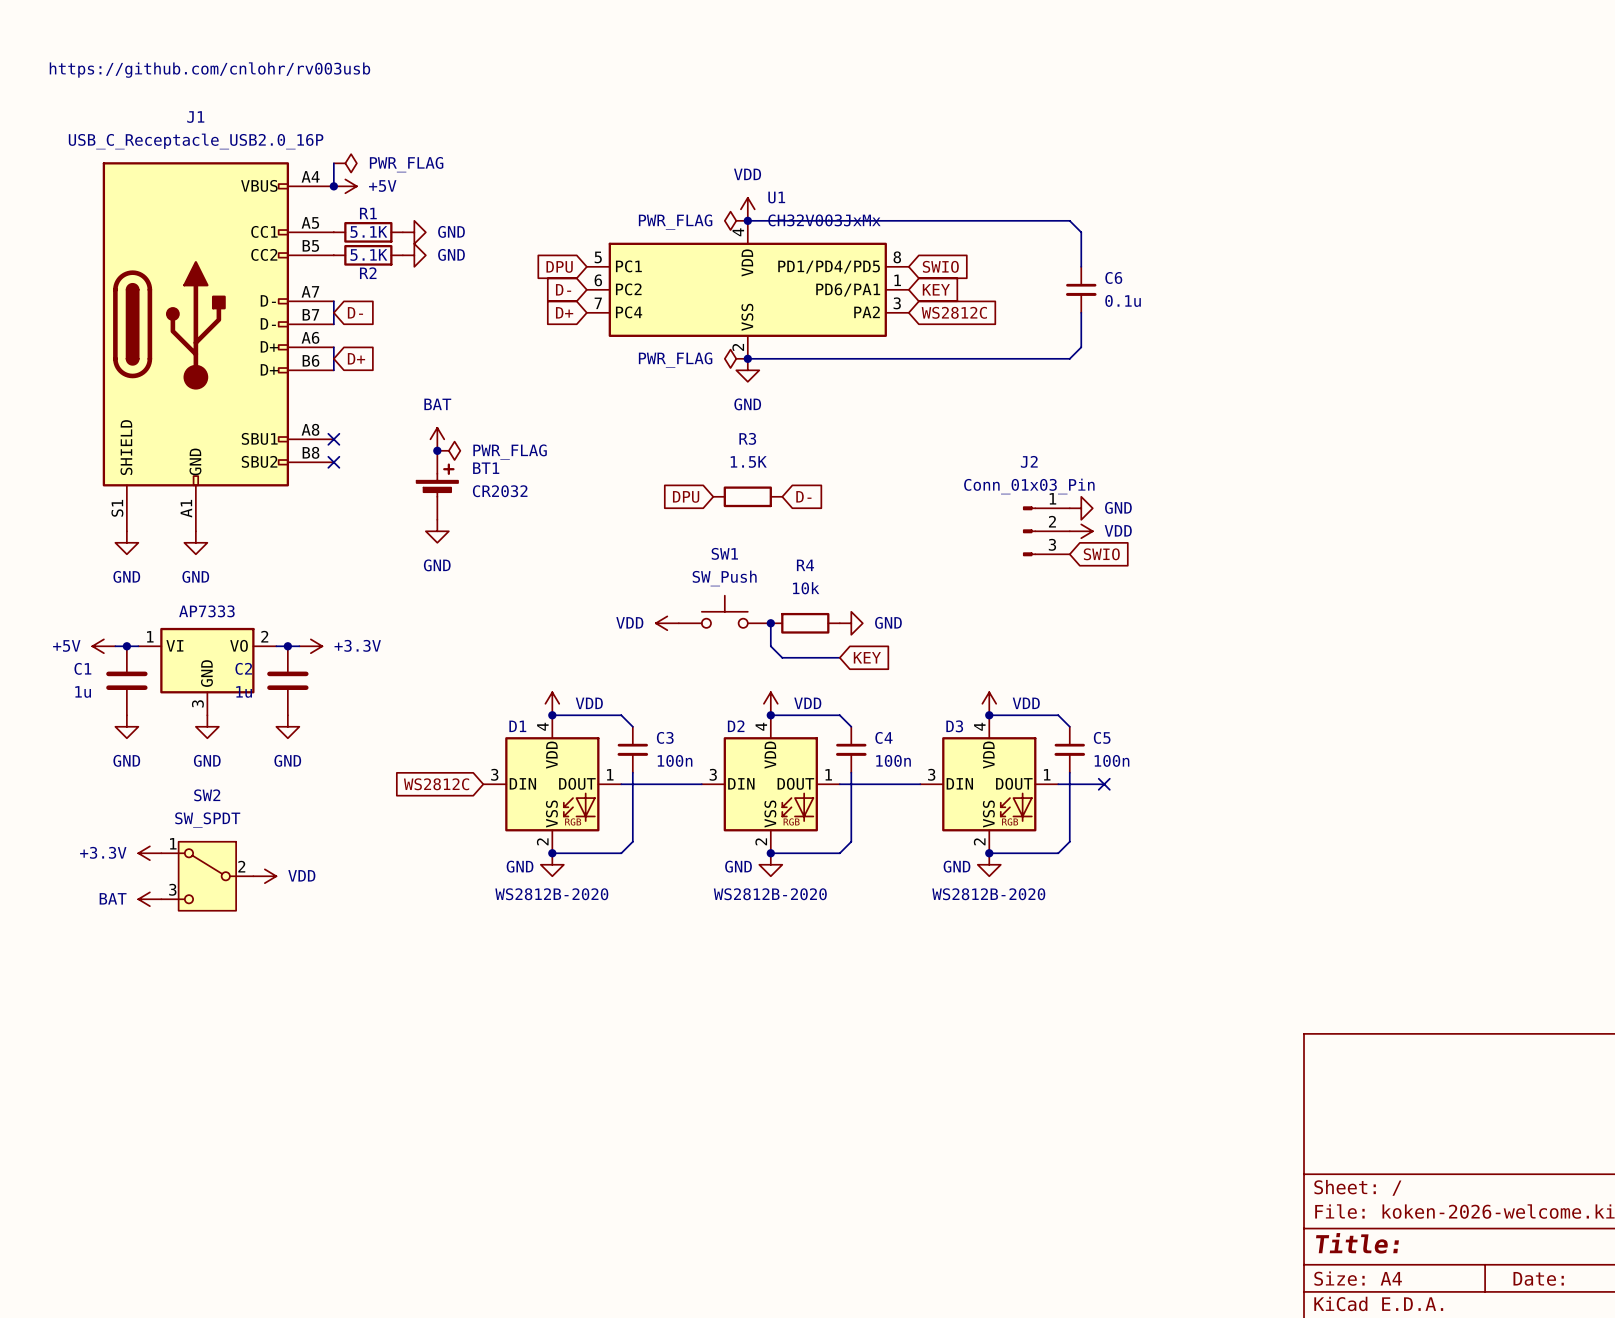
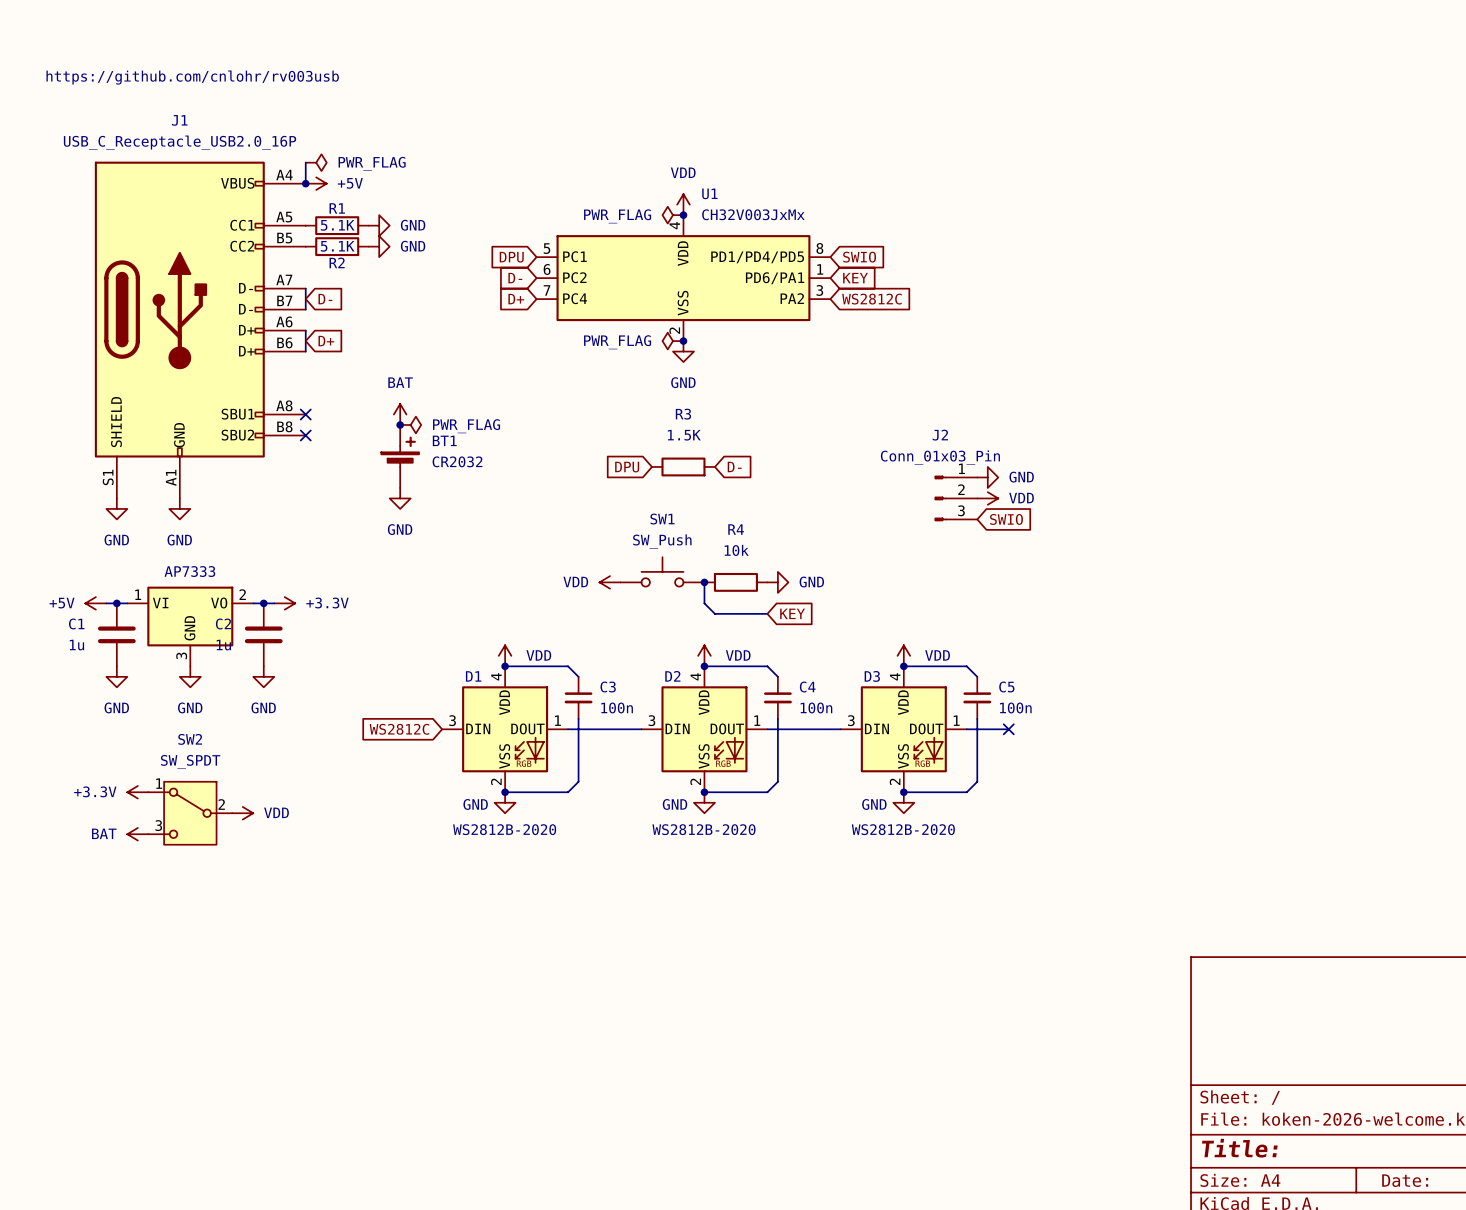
wire: (747, 220) (1069, 220) (1081, 232) (1081, 266) -> none
C6: 0.1u (1081, 289) -> none
wire: (1081, 312) (1081, 347) (1069, 358) (747, 358) -> none

